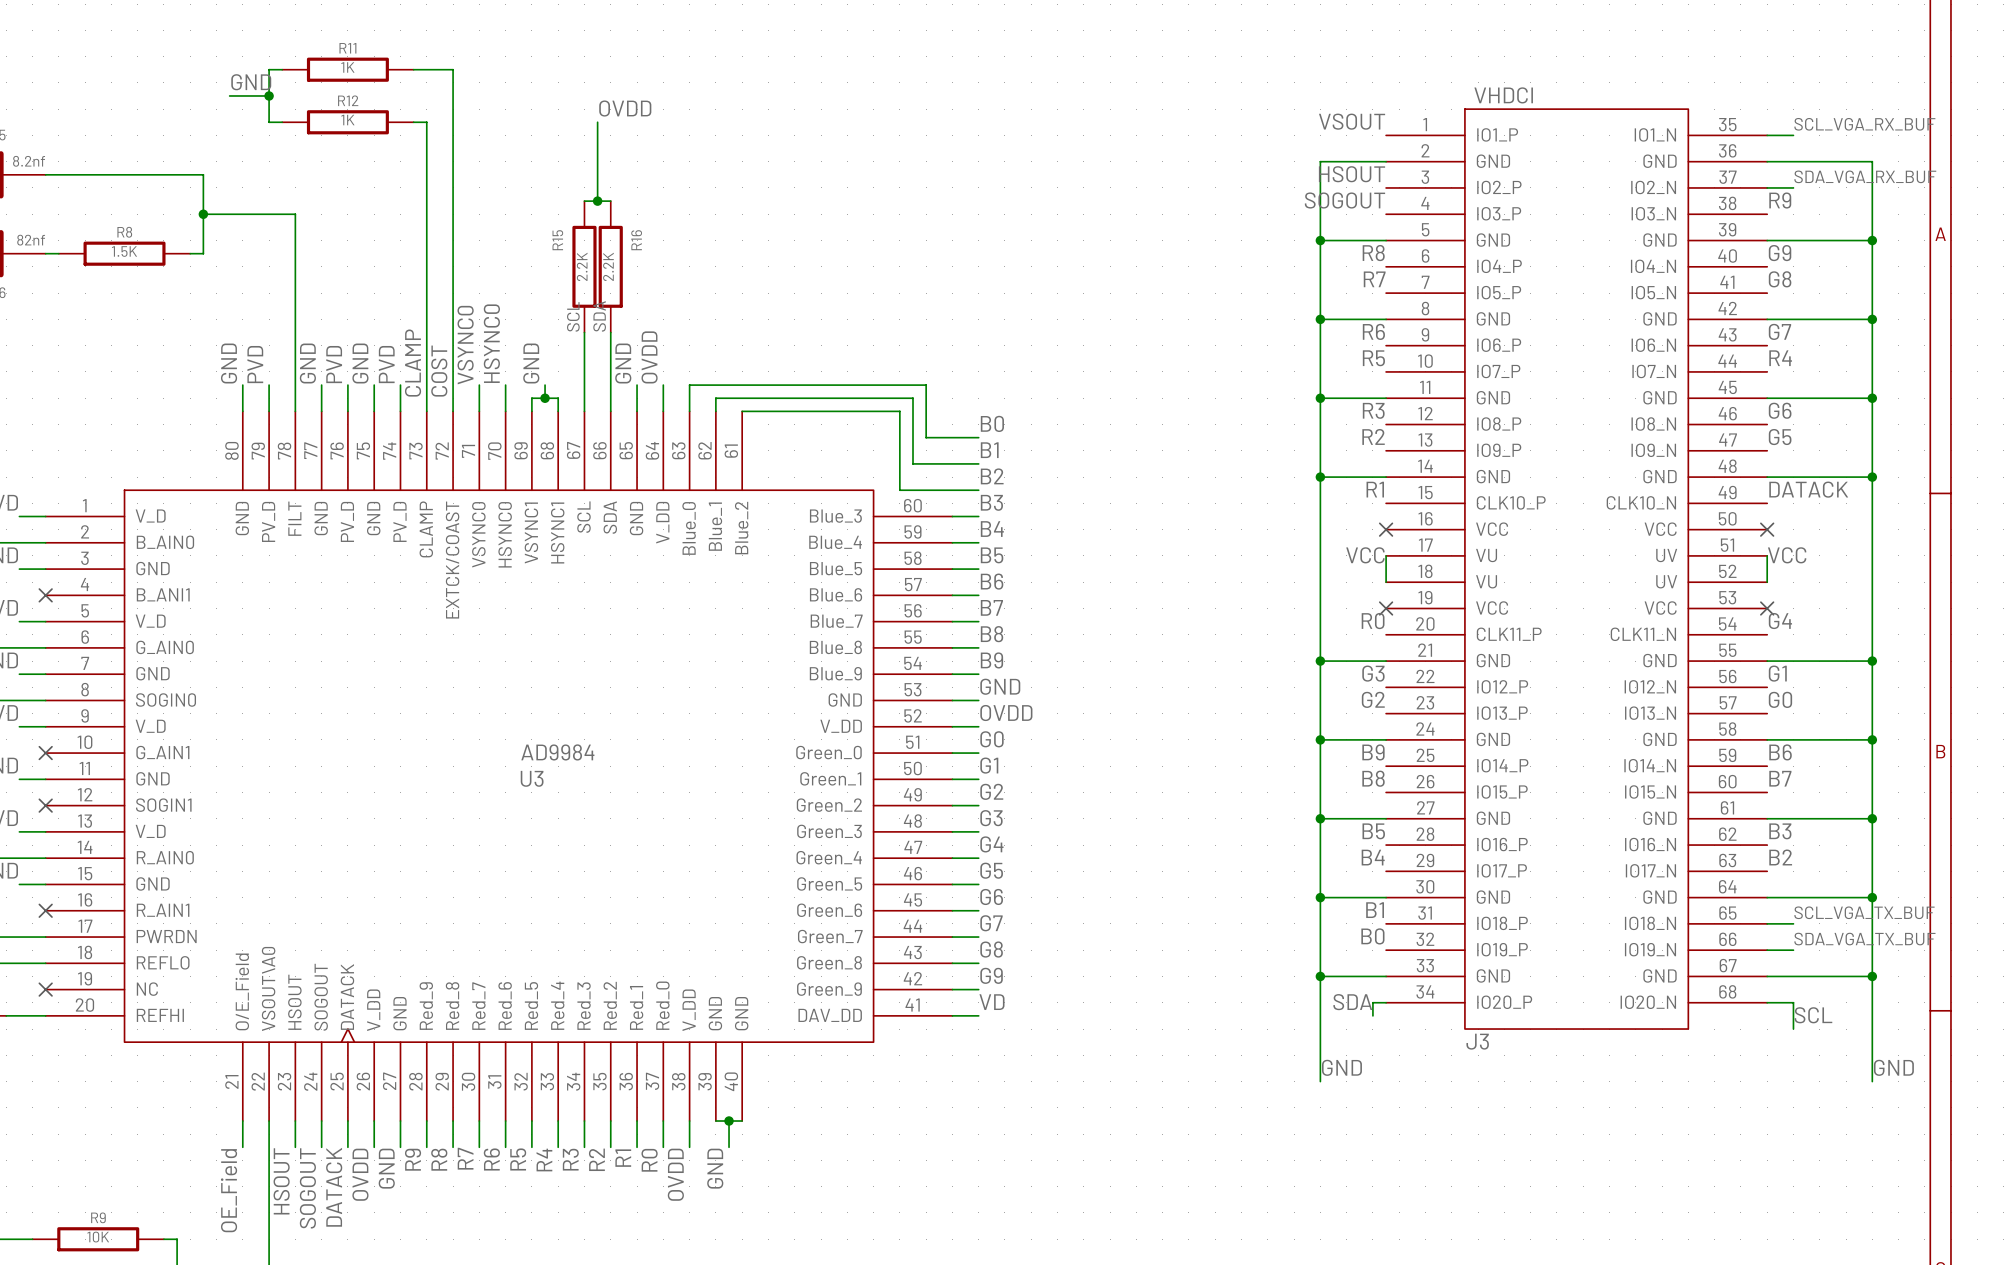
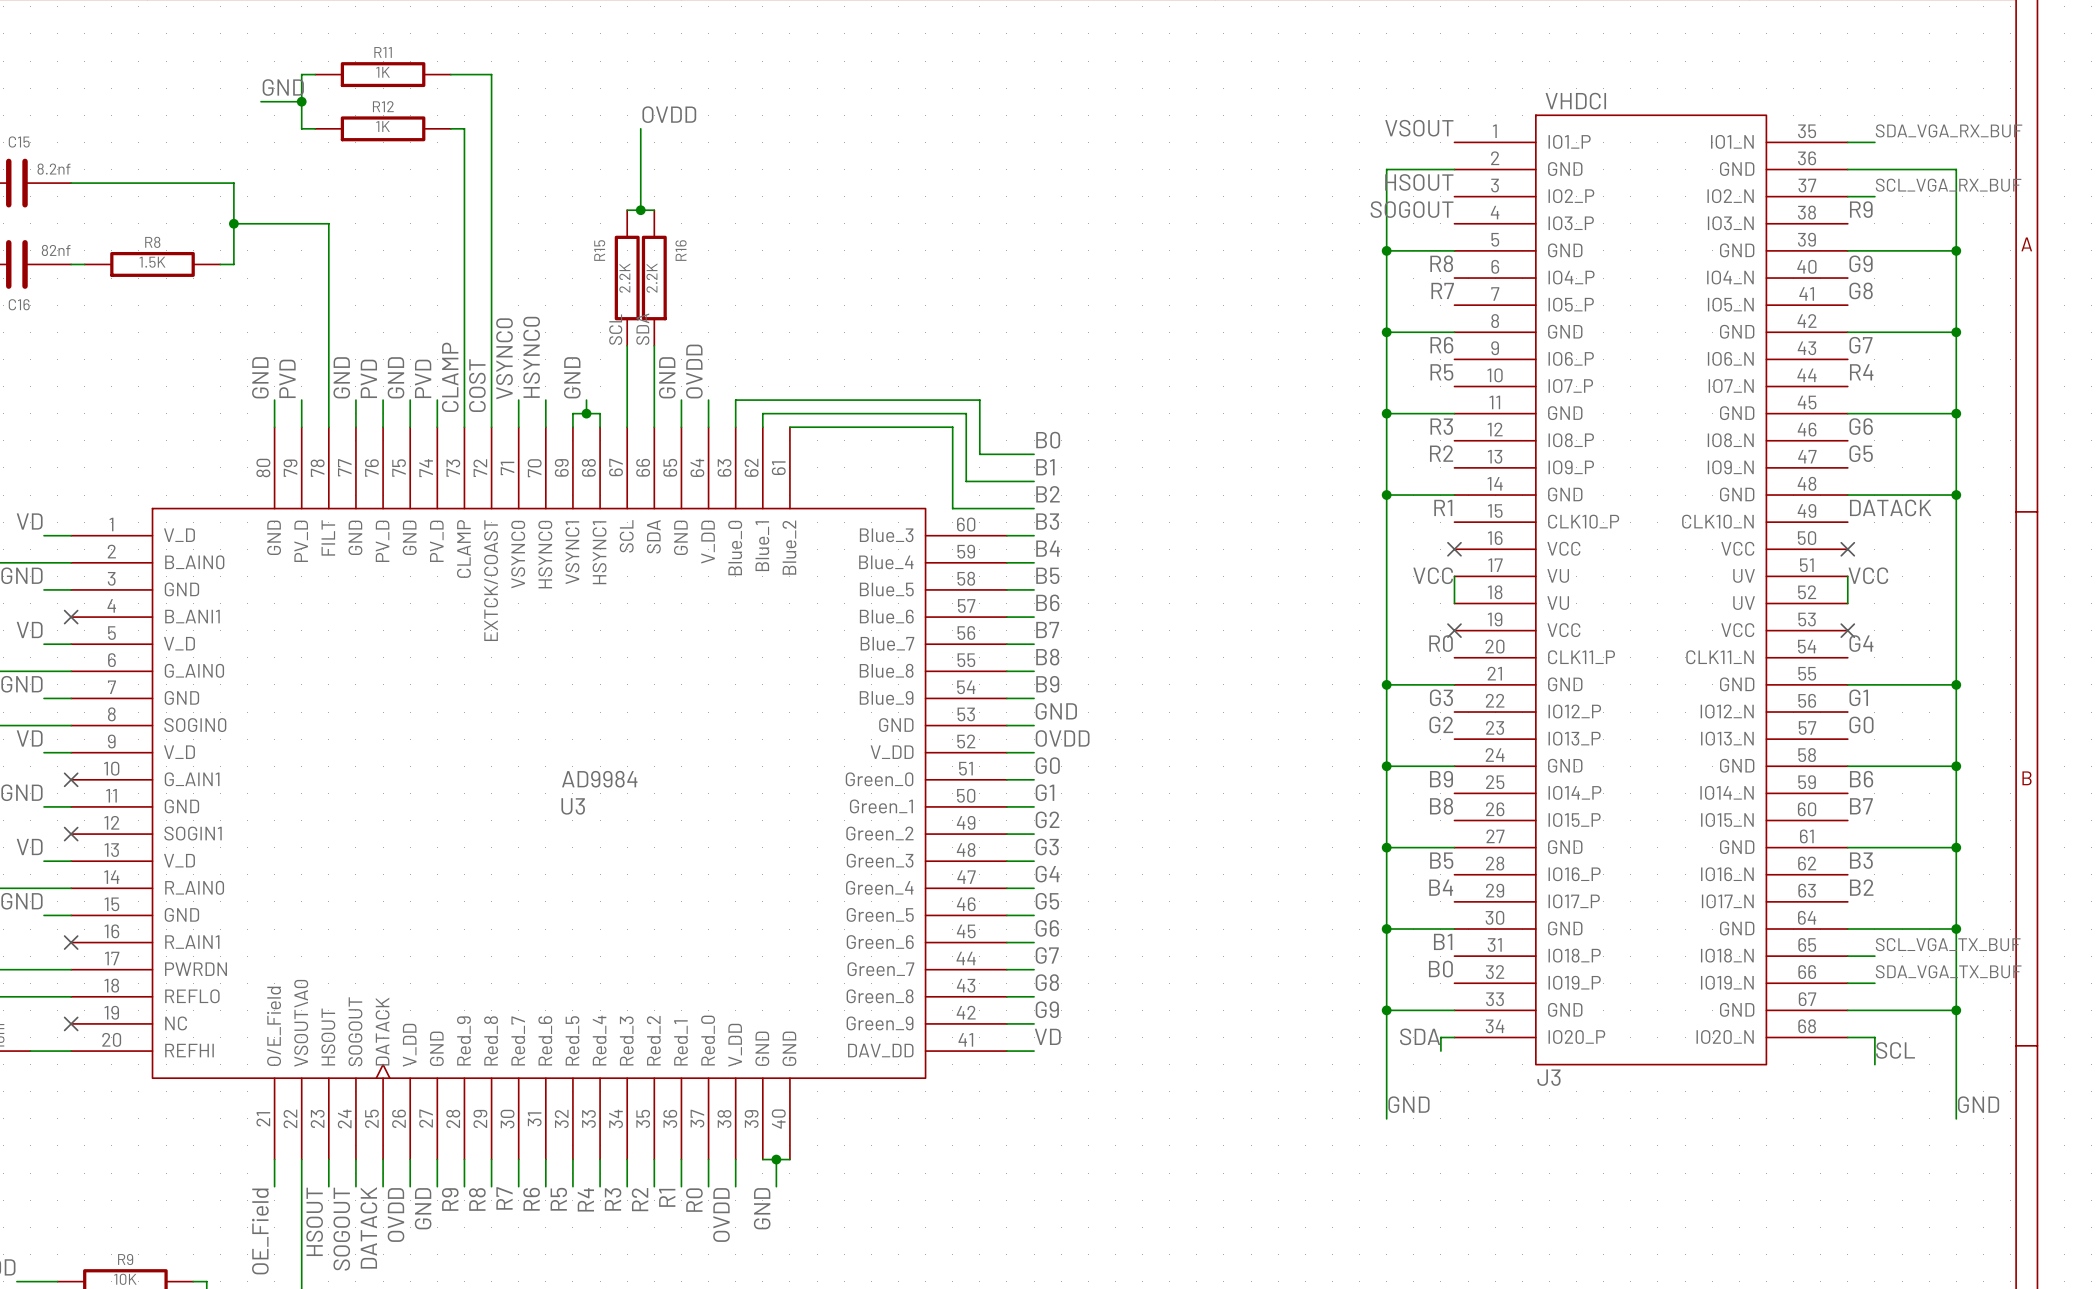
label: SCL_VGA_RX_BUF (1864, 124) -> SDA_VGA_RX_BUF (1949, 130)
label: SDA_VGA_RX_BUF (1865, 176) -> SCL_VGA_RX_BUF (1948, 185)

